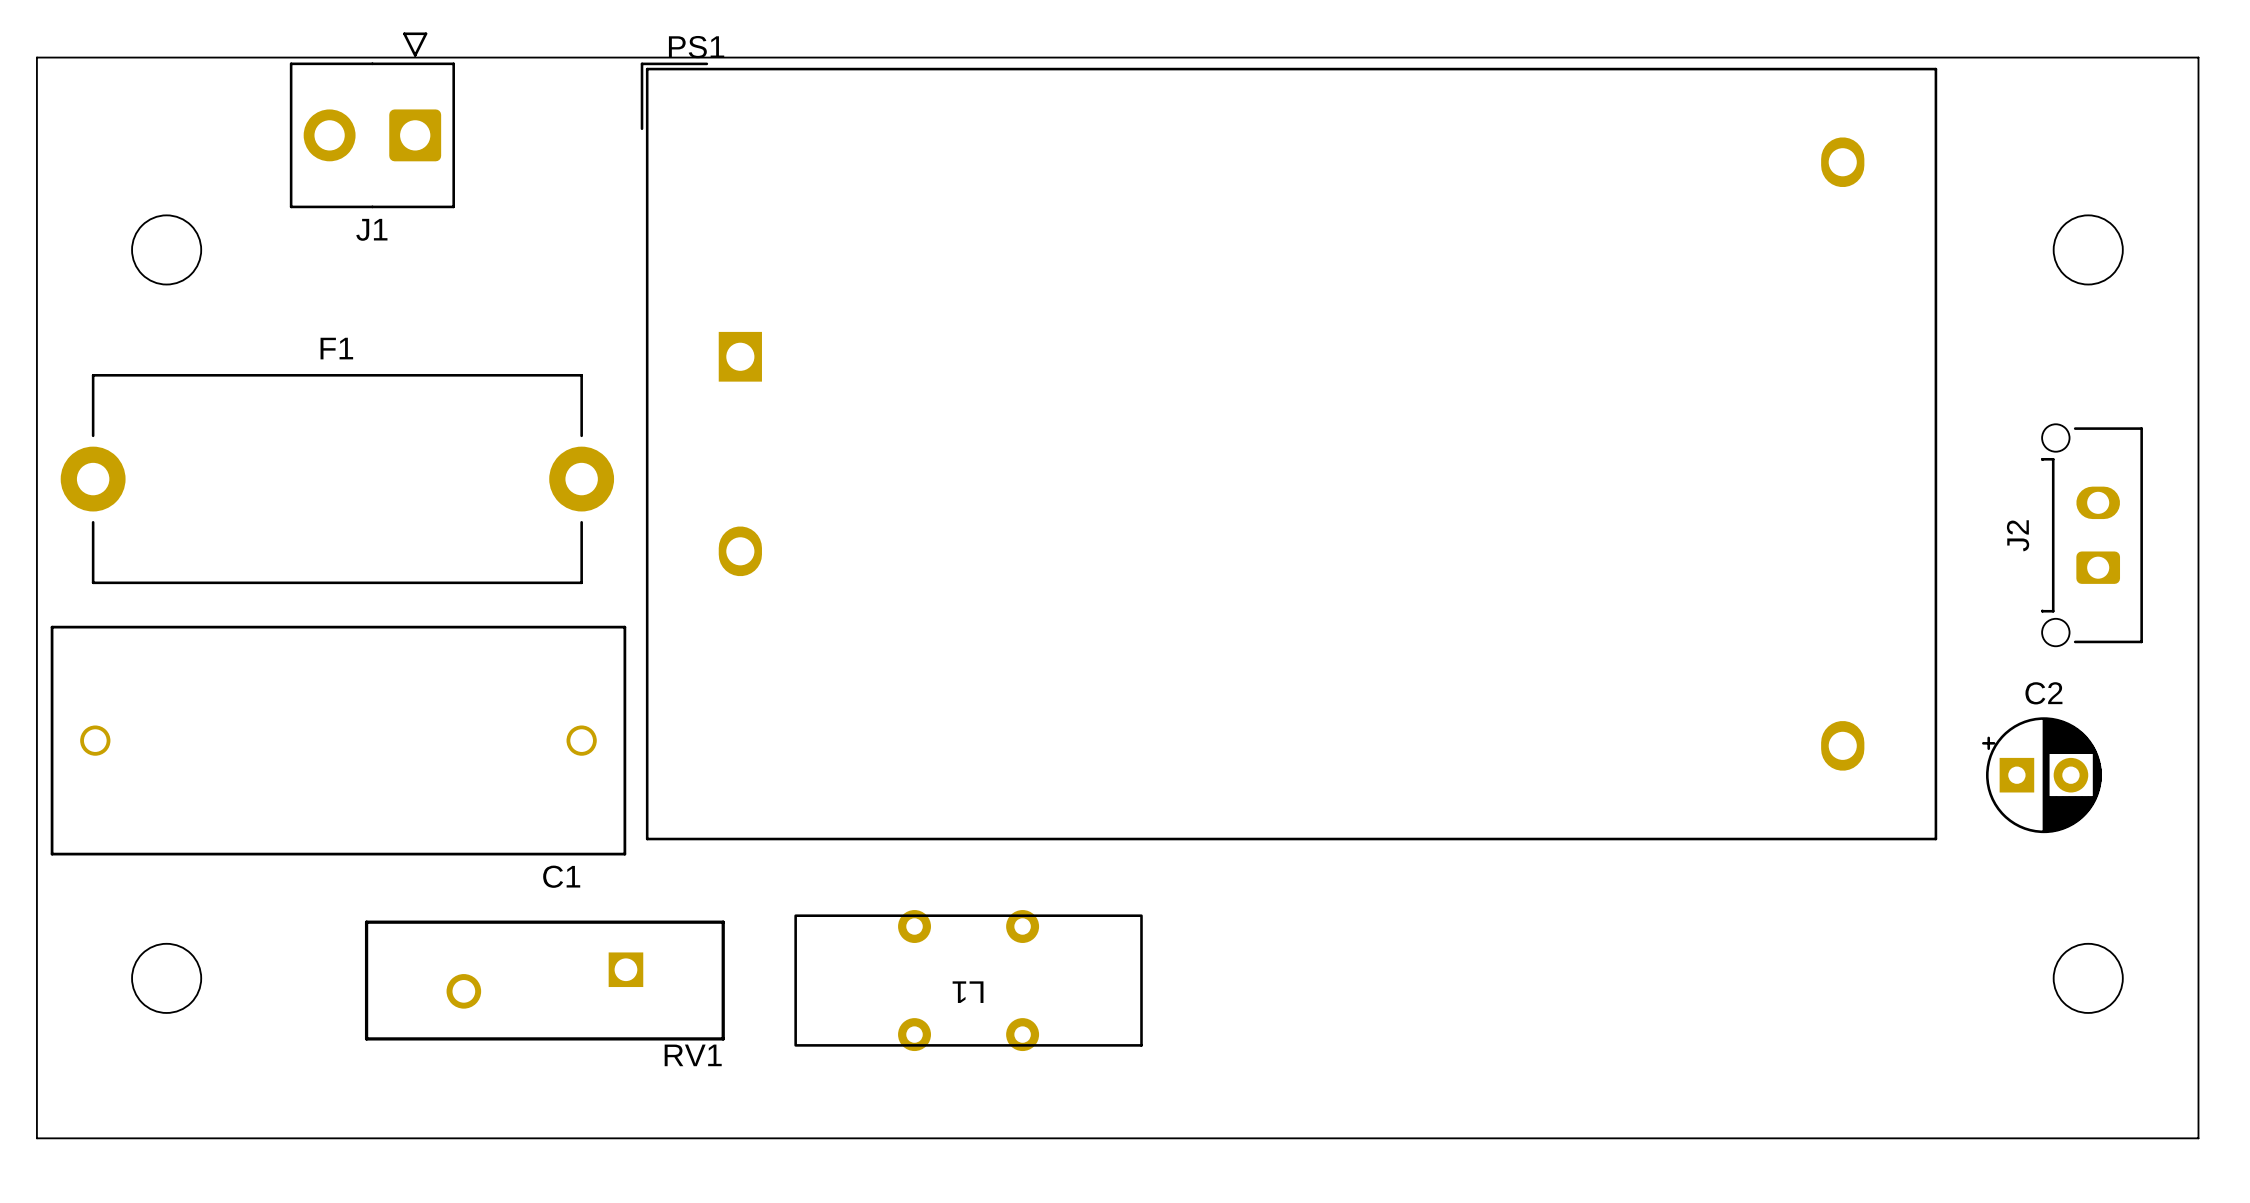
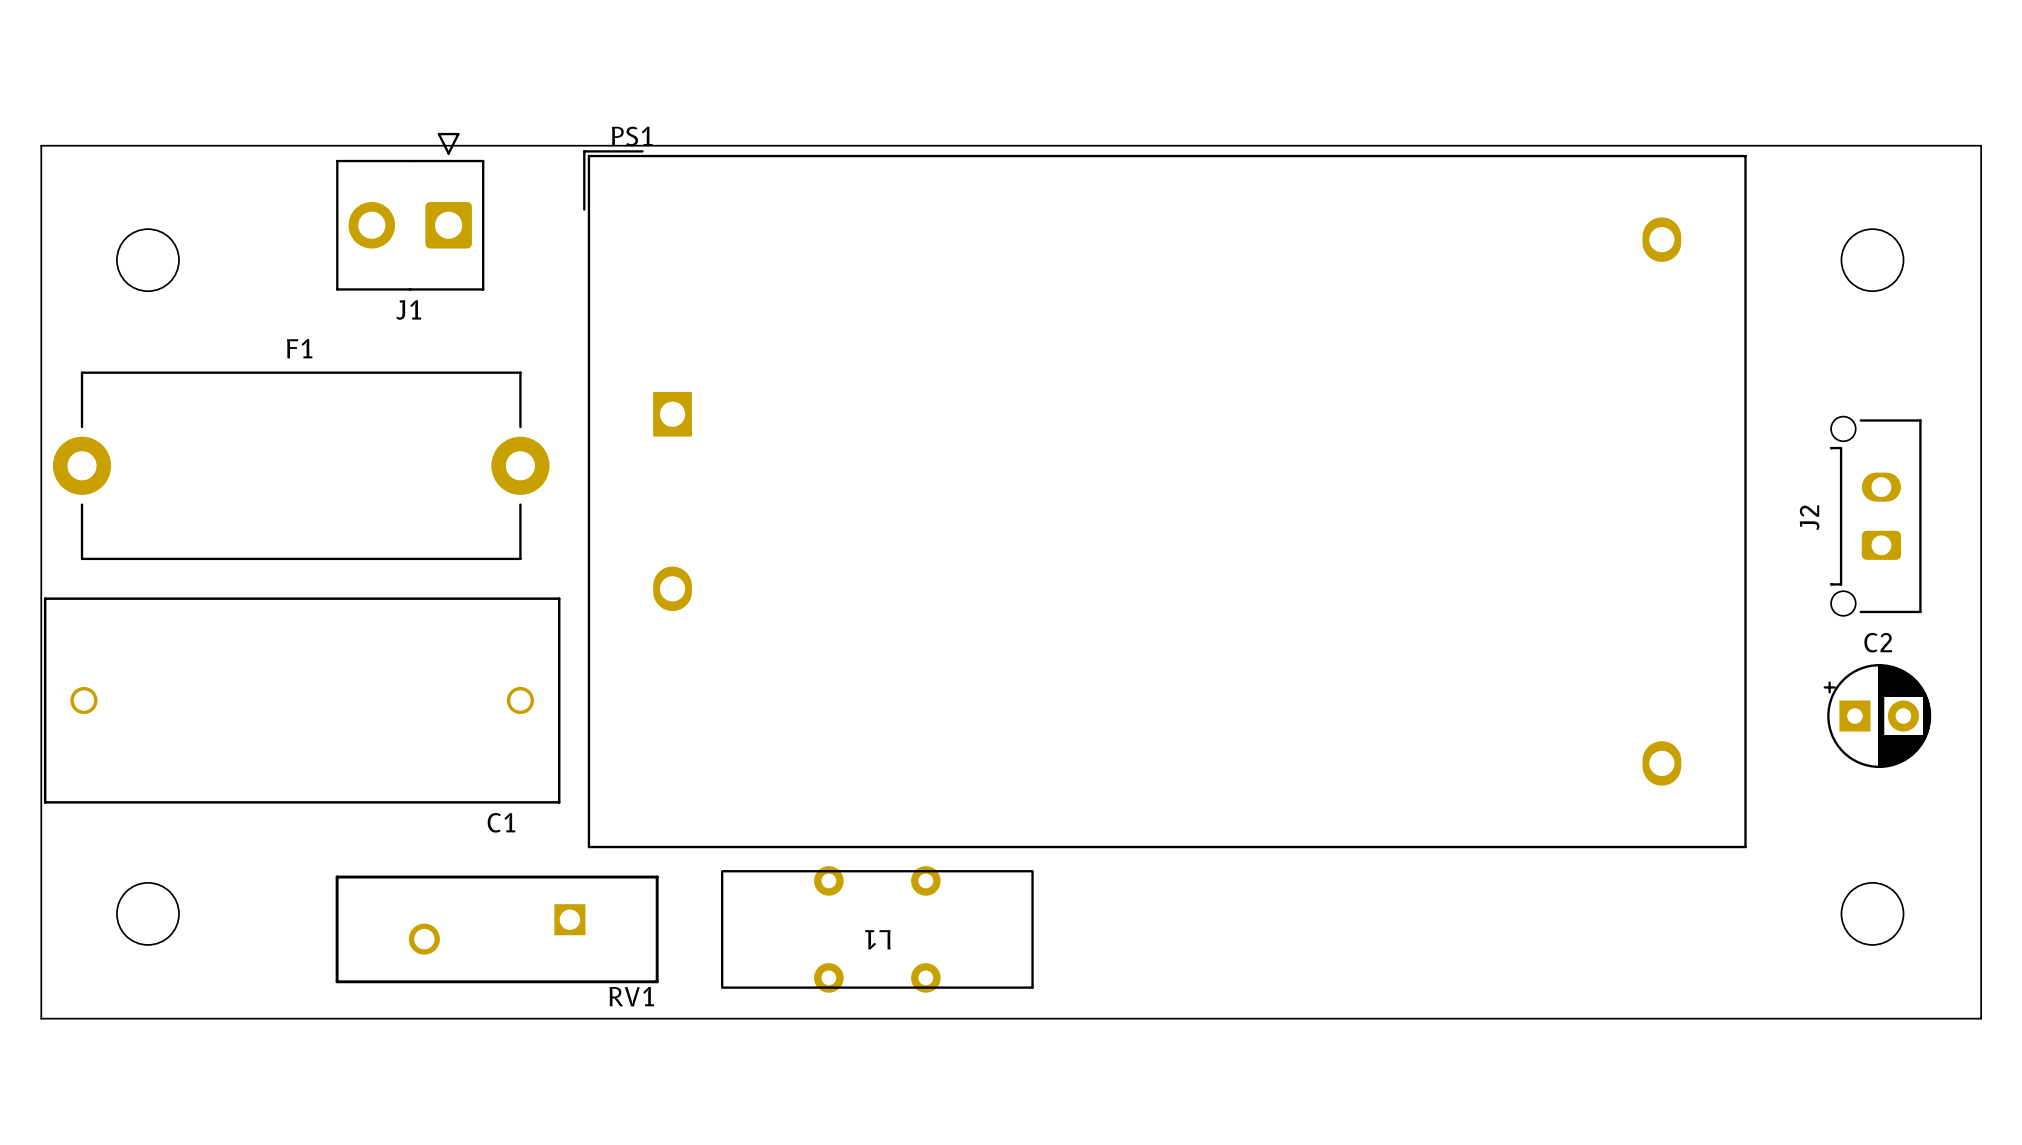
board edge: (36, 57) (2198, 57) (2198, 1138) (36, 1138) (36, 57) -> (41, 145) (41, 1018) (1981, 1018) (1981, 145) (41, 145)
J1 position: (372, 120) -> (410, 211)
PS1 position: (1288, 451) -> (1164, 499)
C2 position: (2041, 775) -> (1877, 716)
RV1 position: (544, 980) -> (497, 929)
L1 position: (968, 980) -> (877, 929)

